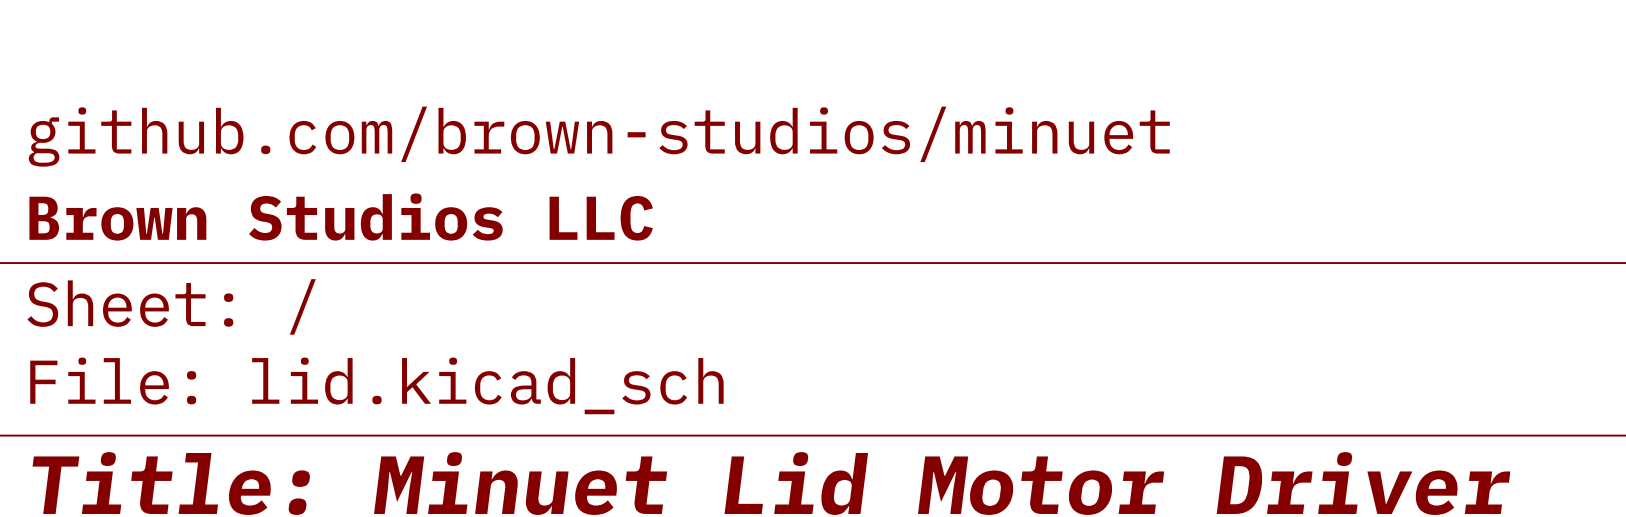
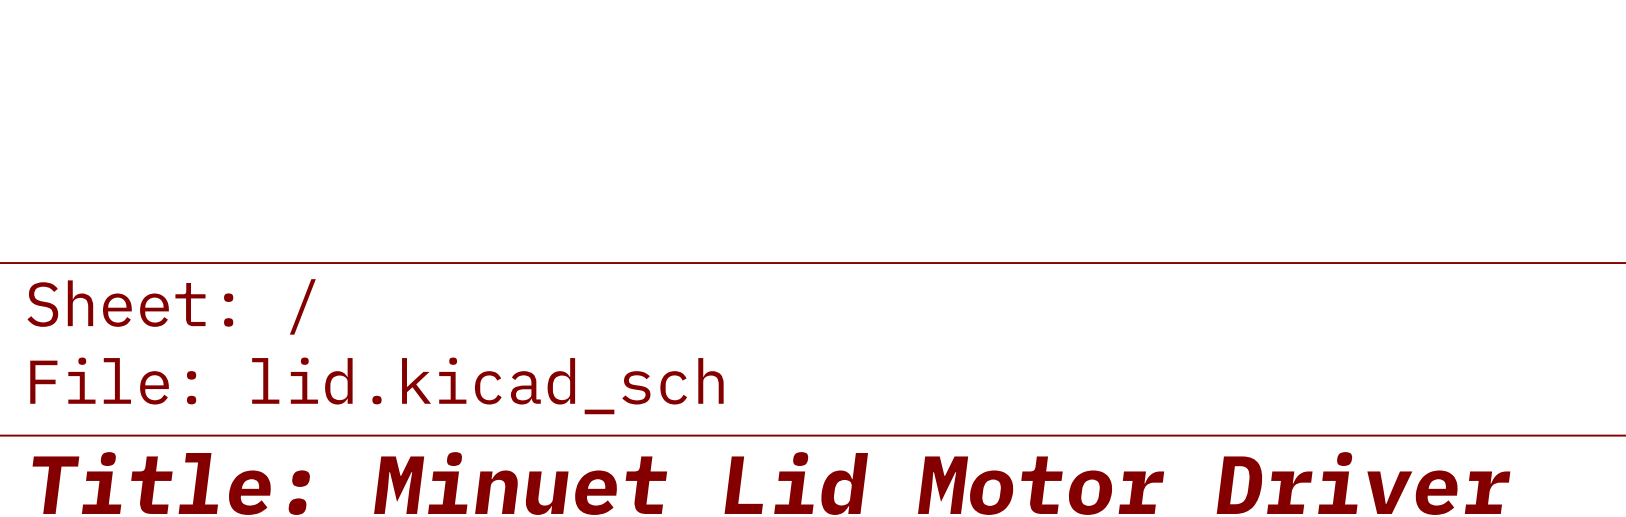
title block: github.com/brown-studios/minuet (599, 136) -> none
title block: Brown Studios LLC (341, 217) -> none

